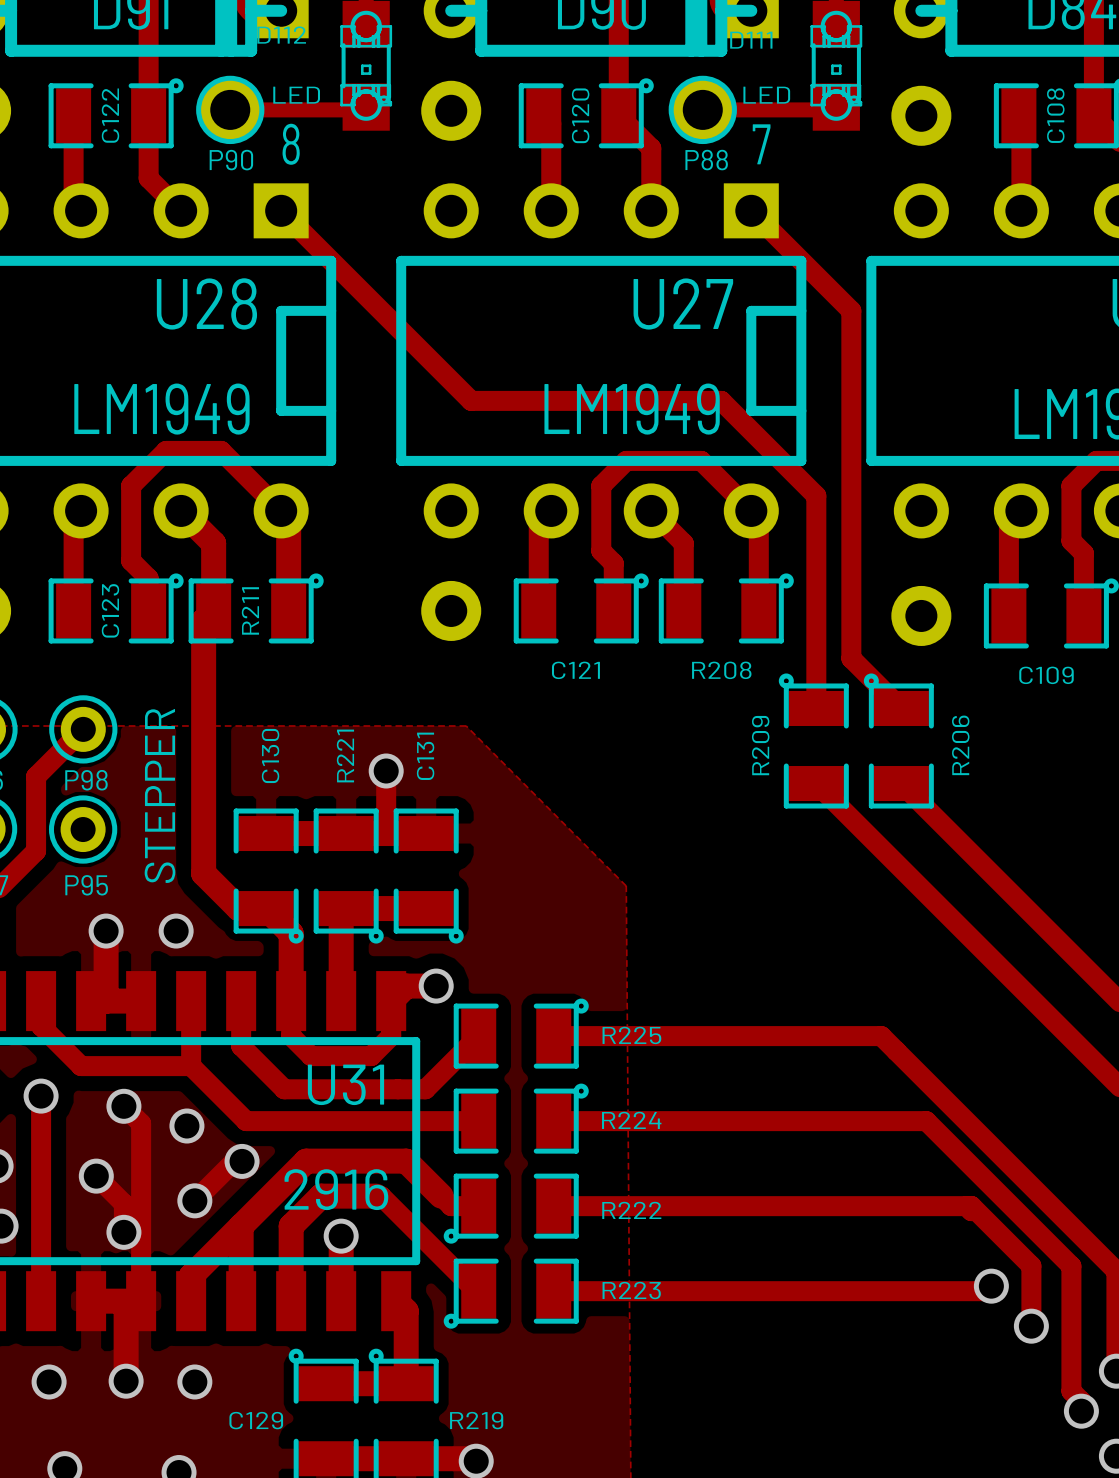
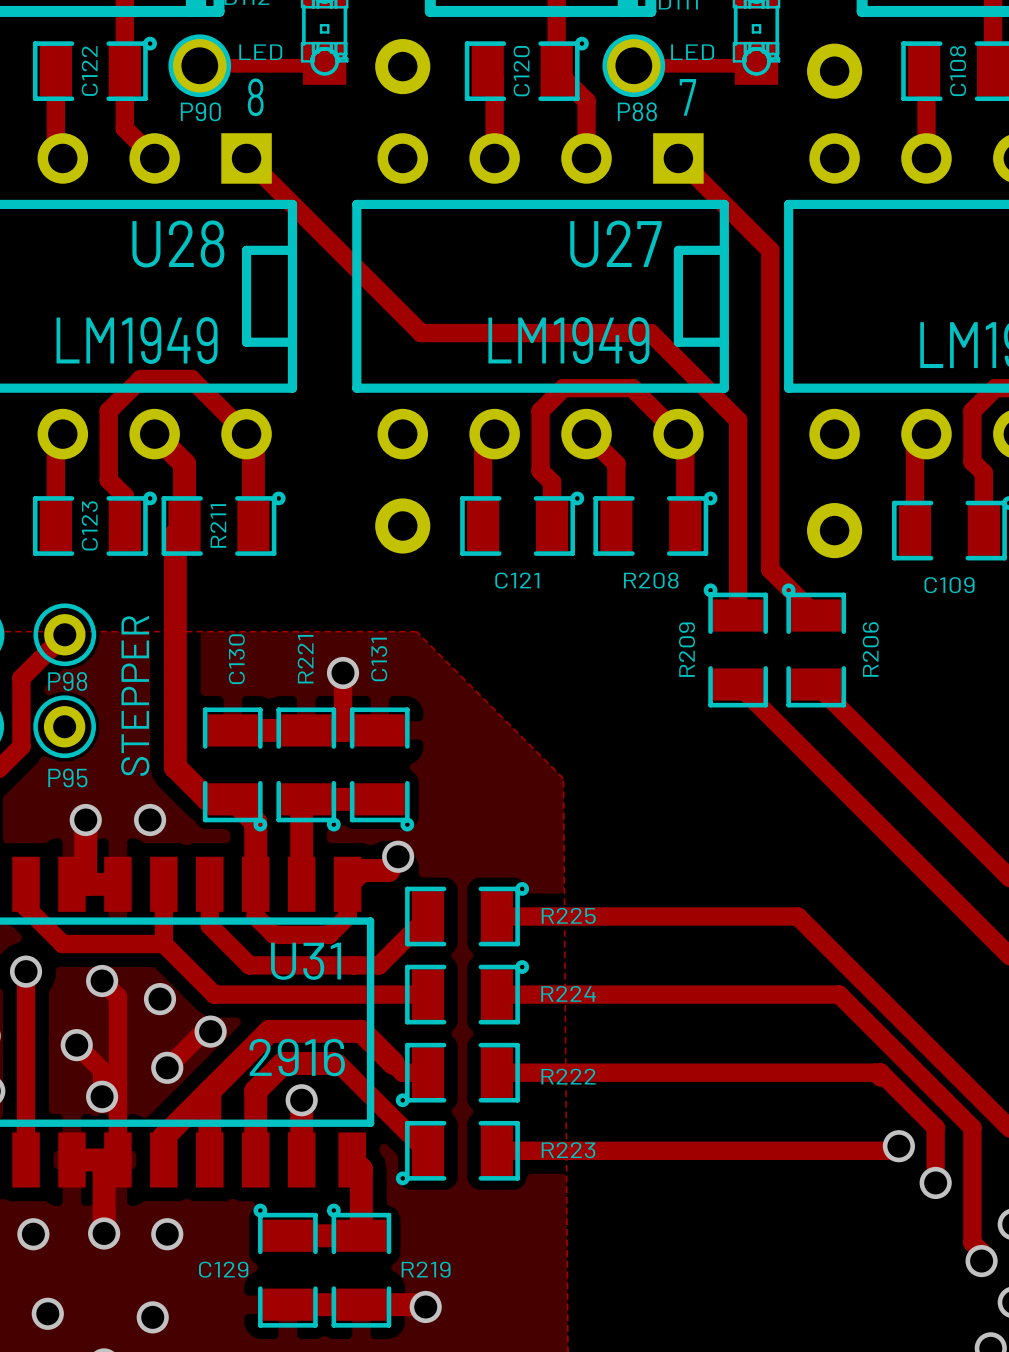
via position: (436, 986) -> (398, 856)

